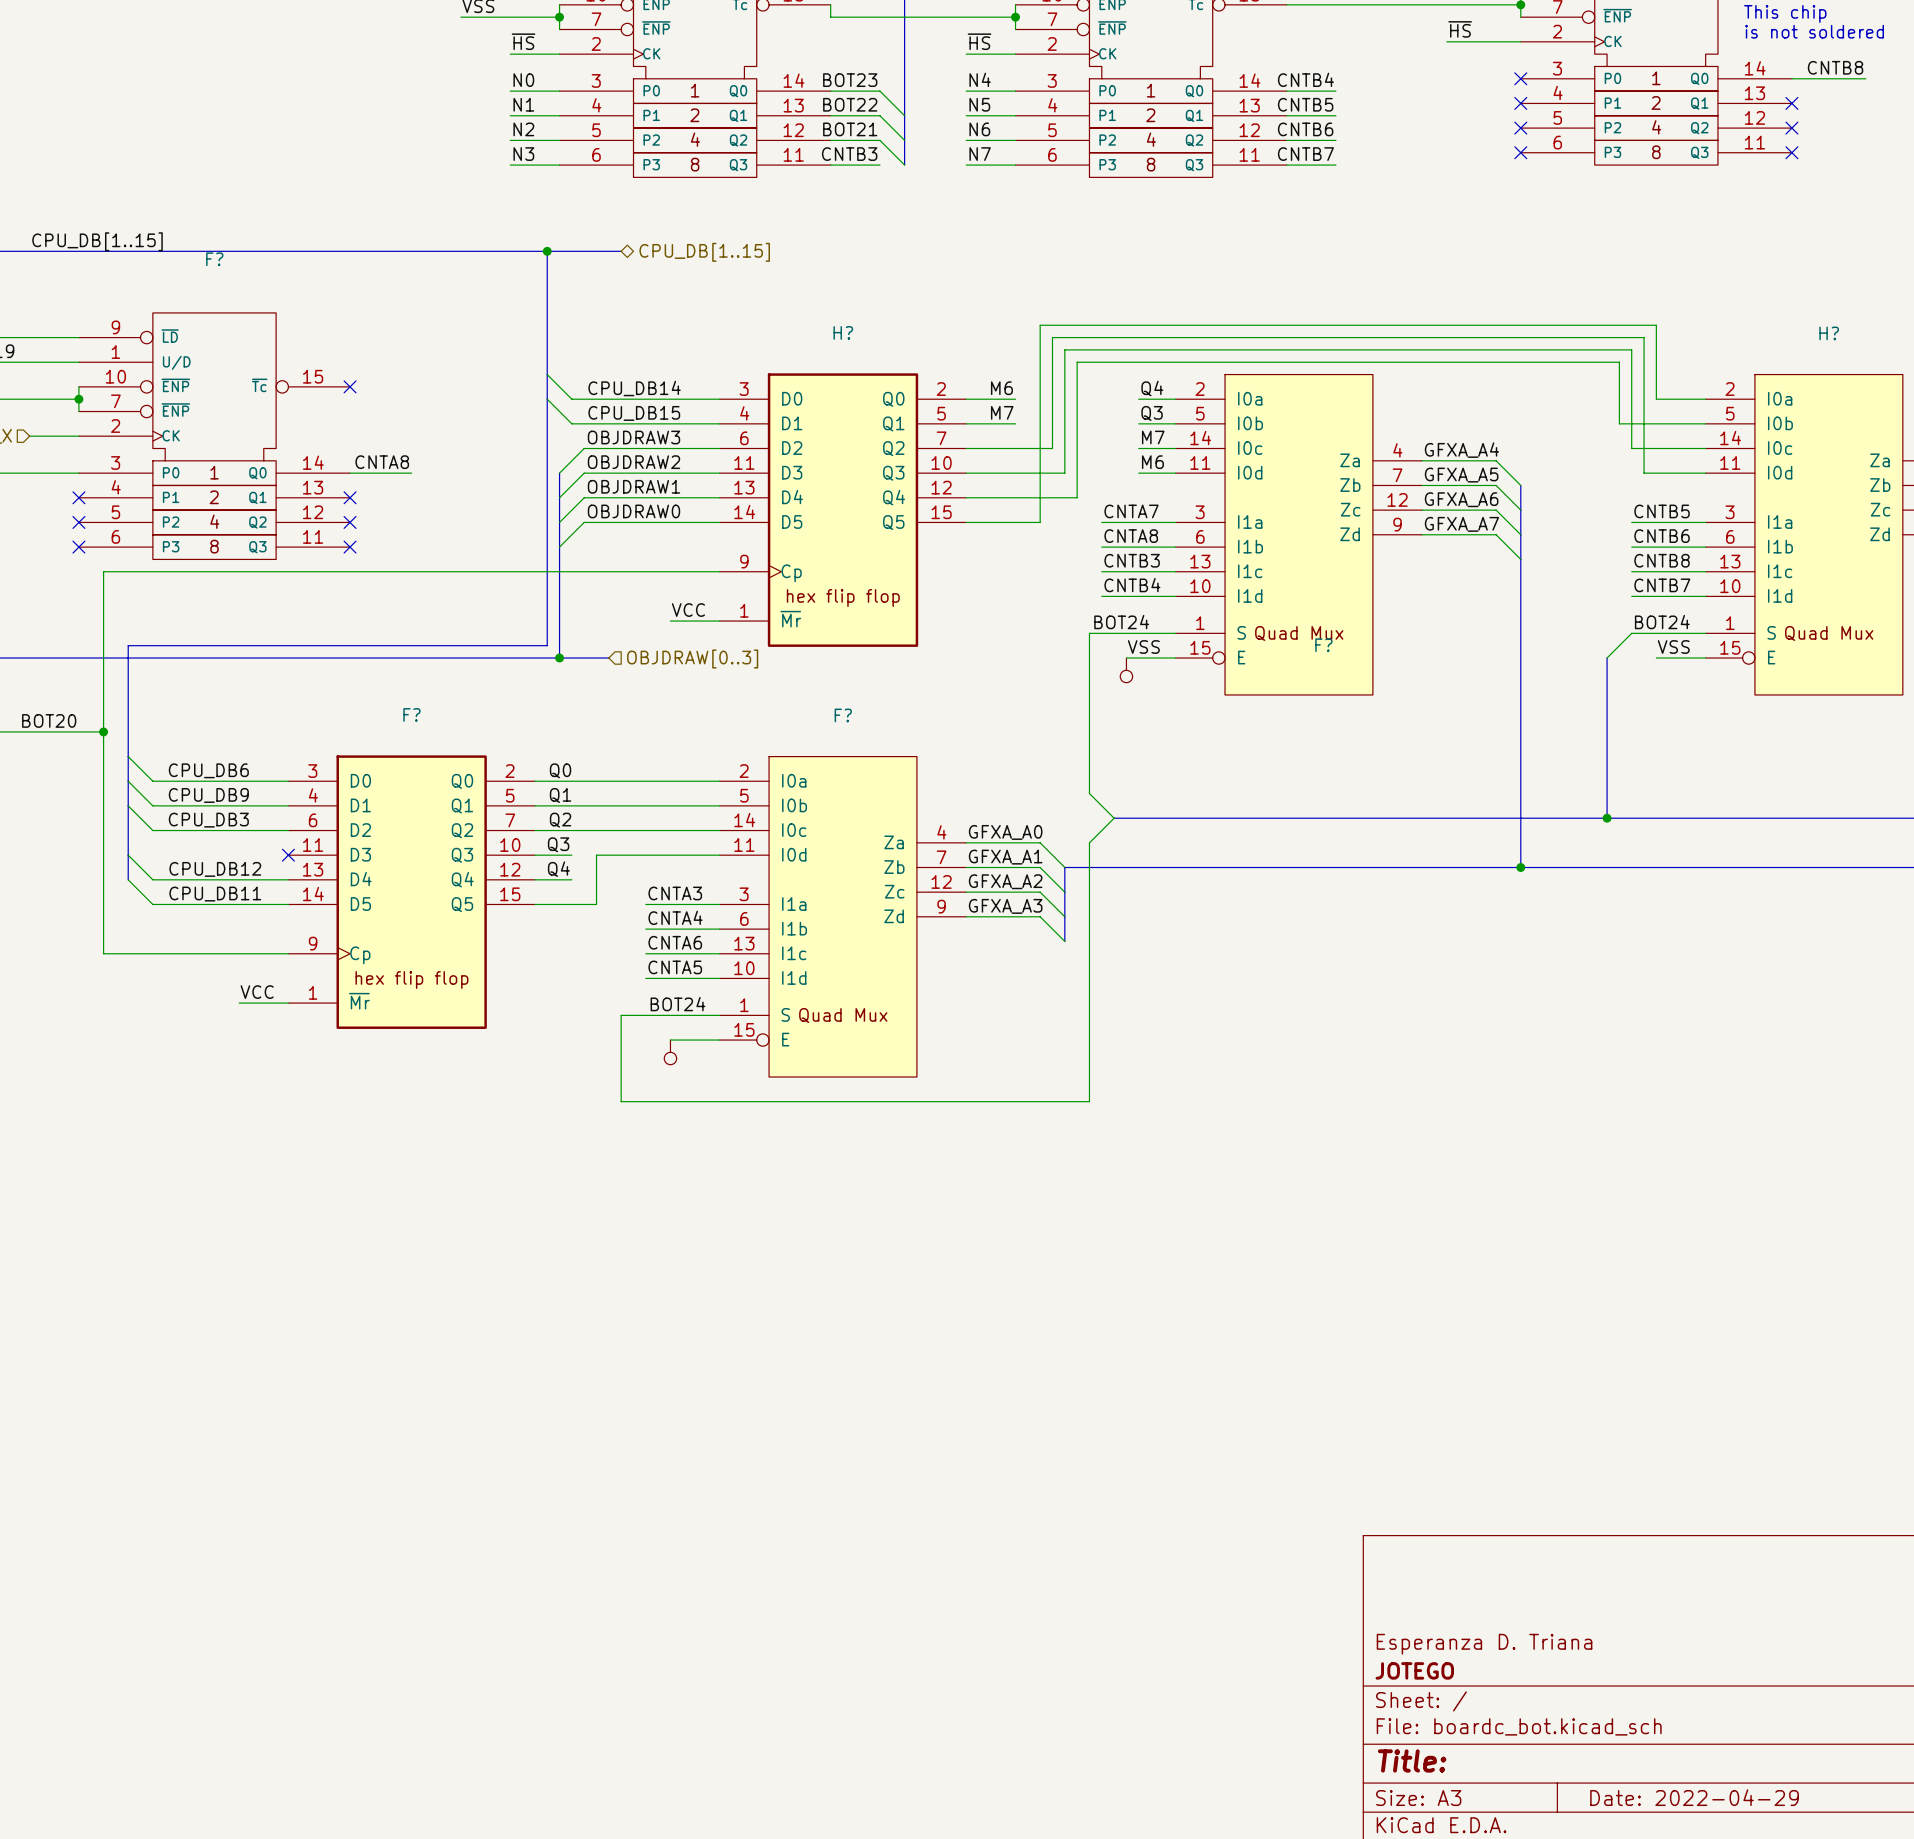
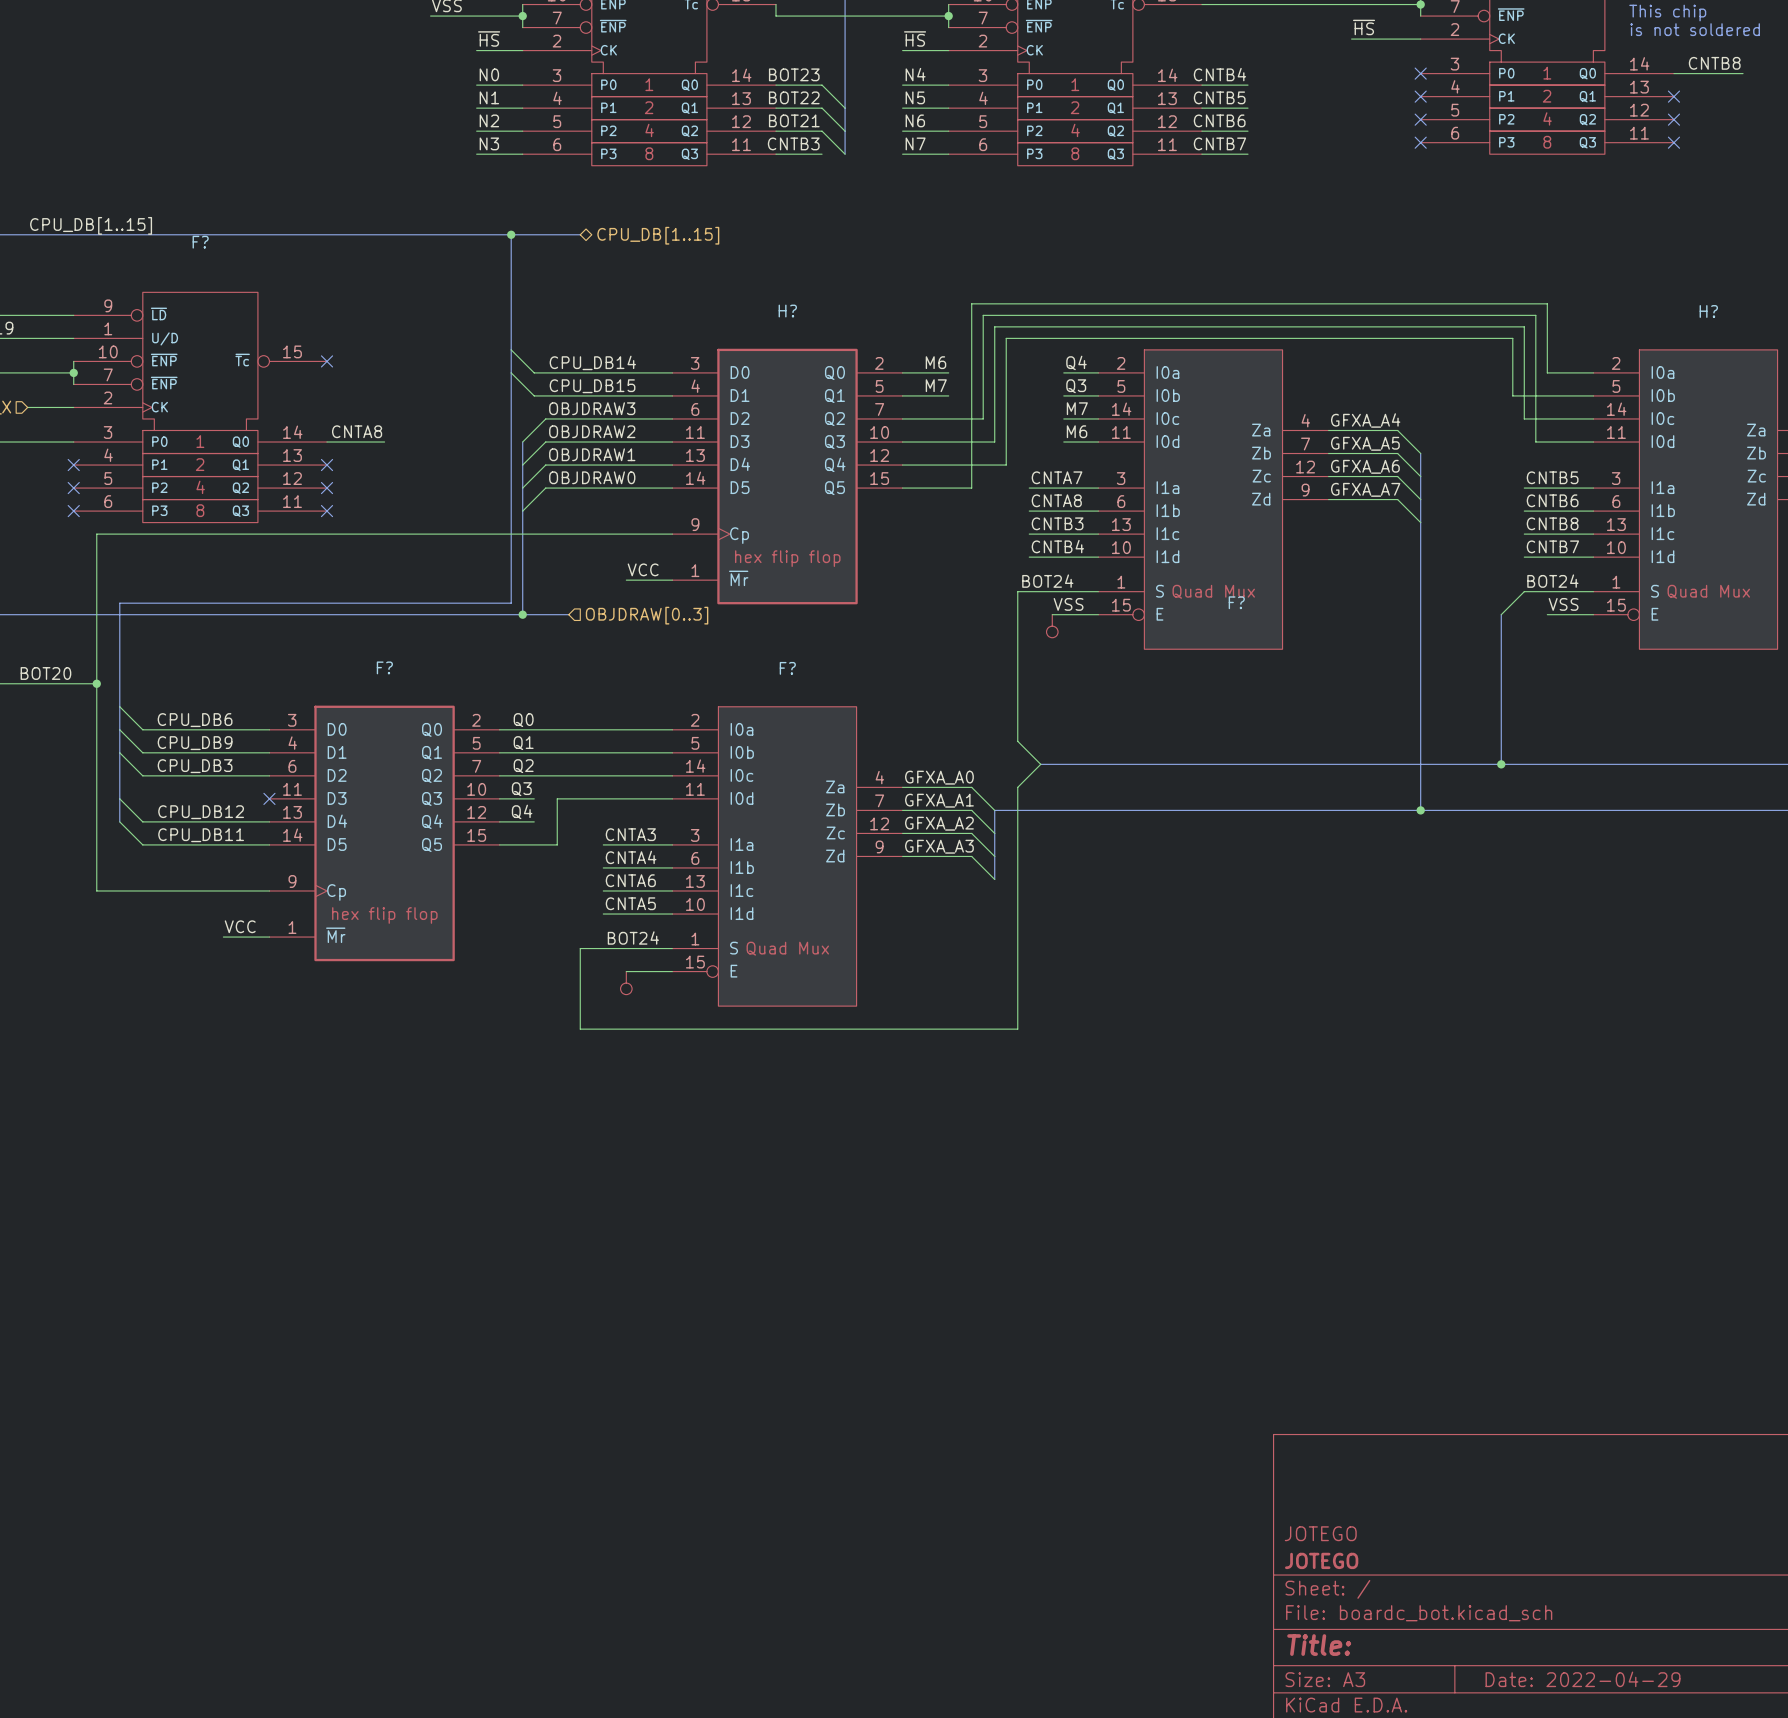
title block: Esperanza D. Triana (1484, 1644) -> JOTEGO (1320, 1533)

